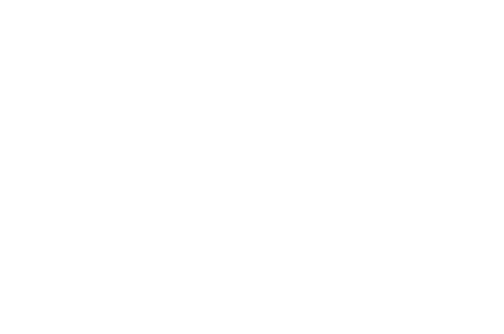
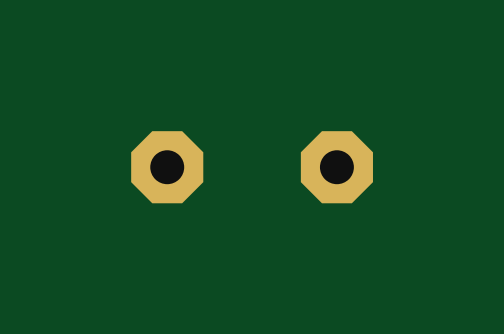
part: none -> (167, 167)
part: none -> (336, 167)

